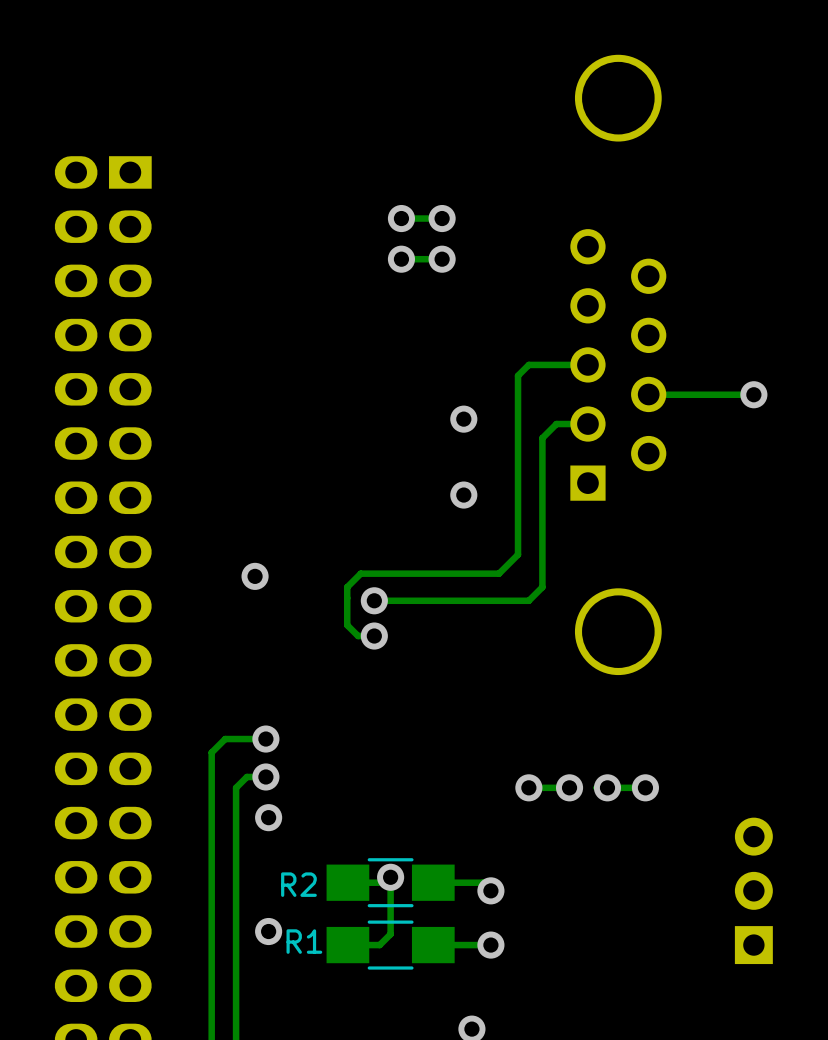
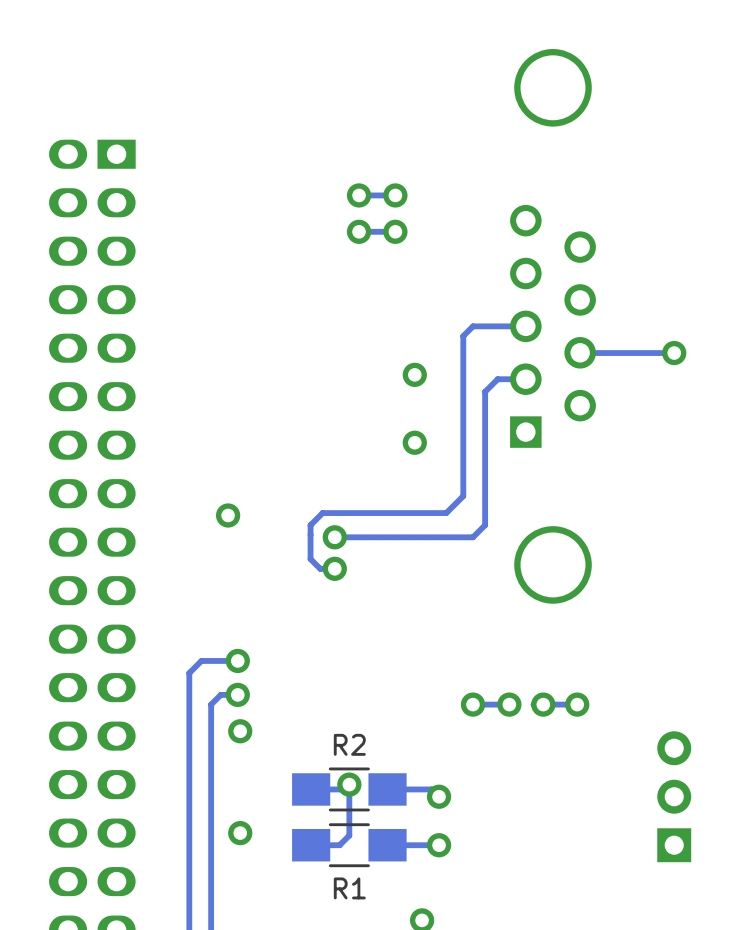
R2 name position: R2 (298, 884) -> R2 (349, 744)
R1 name position: R1 (304, 941) -> R1 (349, 888)

